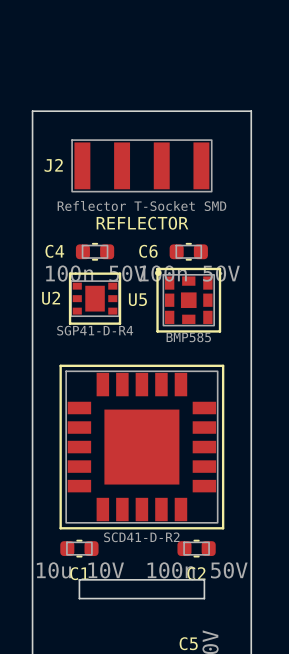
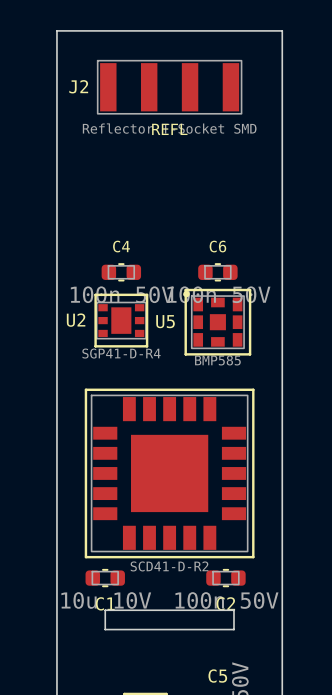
board edge: (32, 111) (251, 111) -> (56, 127) (56, 30) (282, 30) (282, 127)
text: none -> REFL (169, 129)
J2 position: (141, 165) -> (169, 87)
text: REFLECTOR (142, 223) -> none
C4 name position: C4 (54, 251) -> C4 (121, 246)
C6 name position: C6 (148, 251) -> C6 (217, 246)

